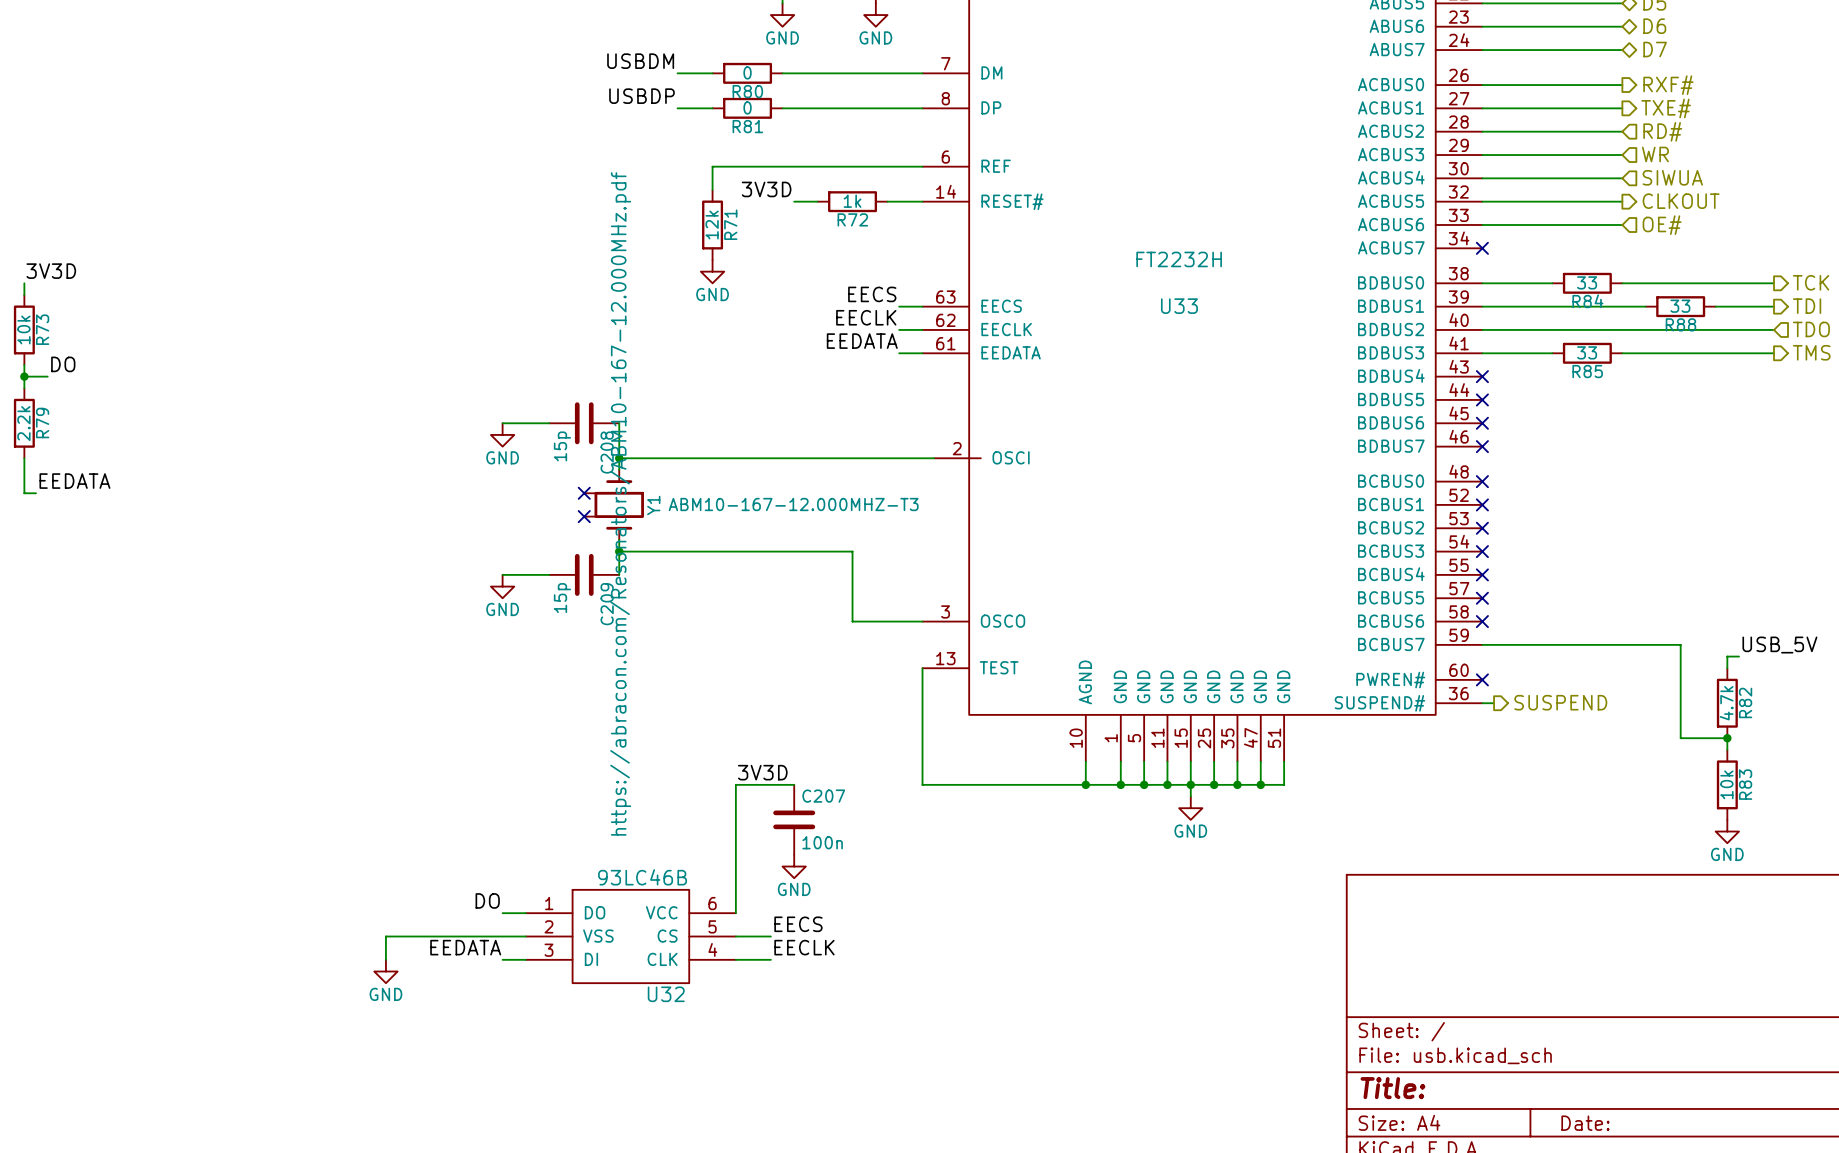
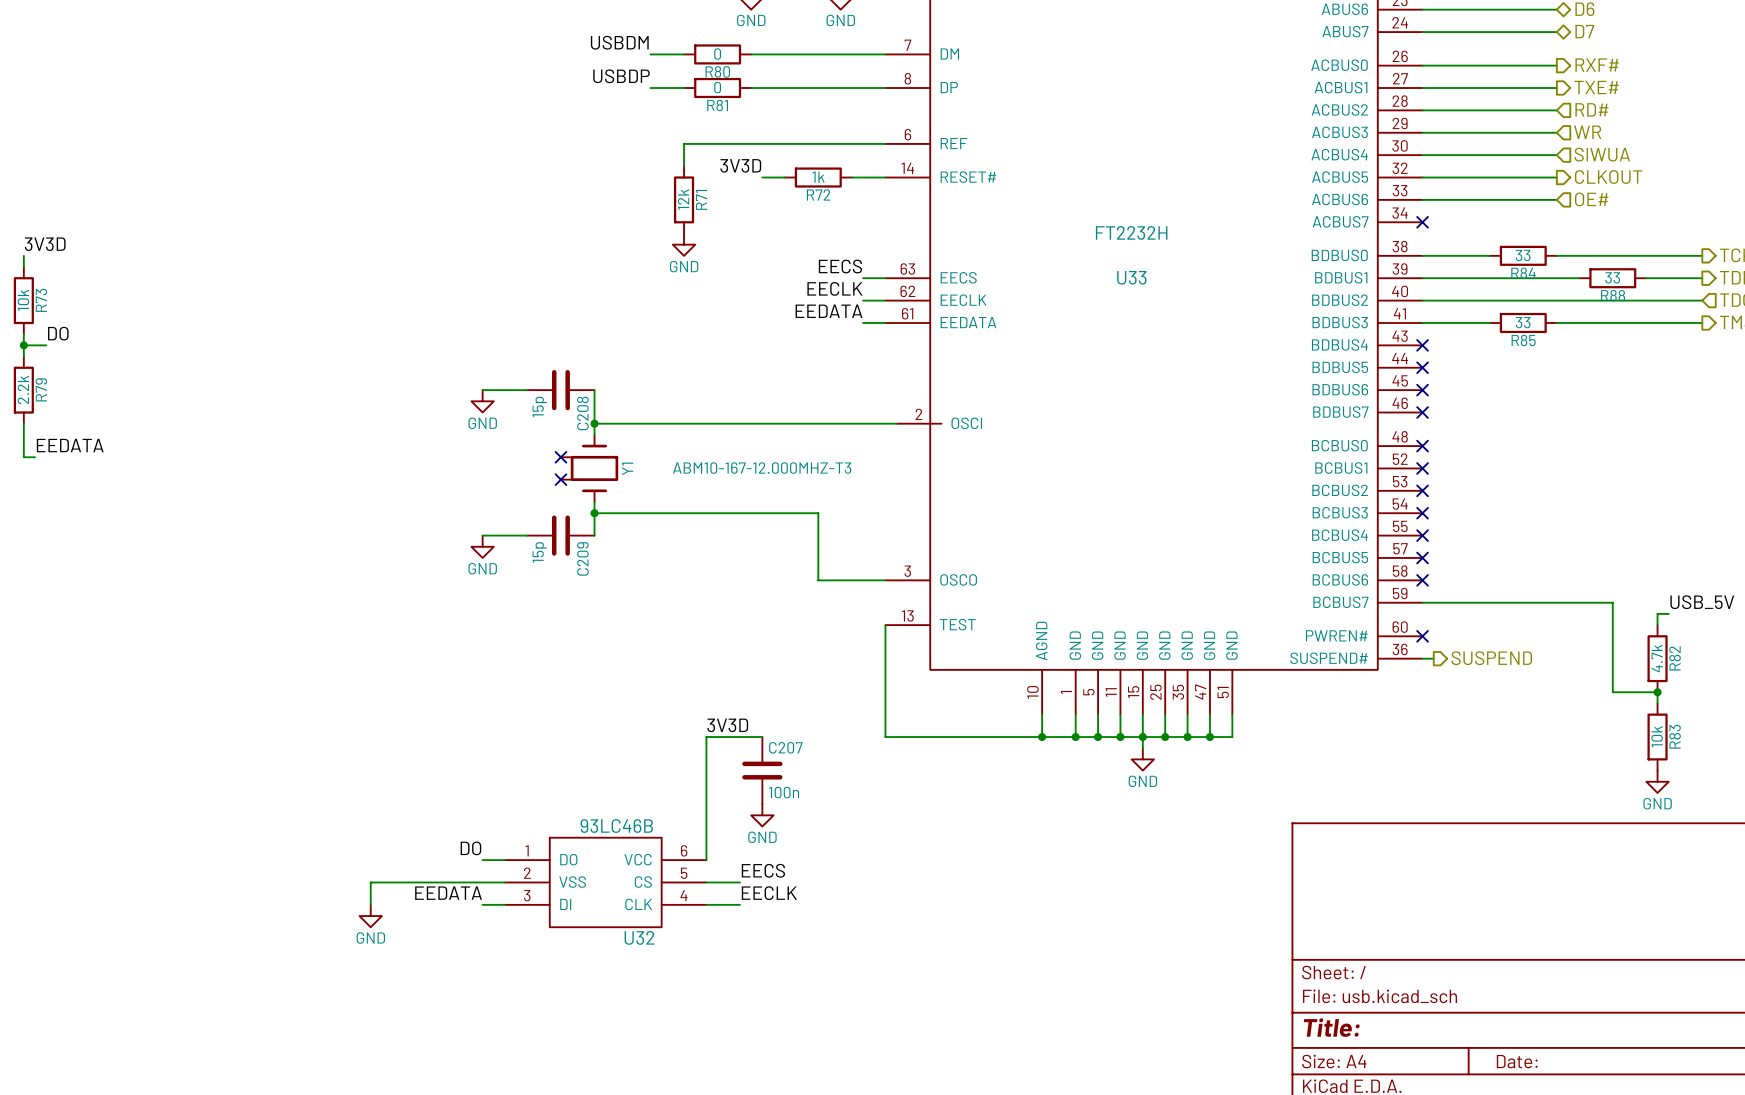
Y1 text: https://abracon.com/Resonators/ABM10-167-12.000MHz.pdf (620, 503) -> none

